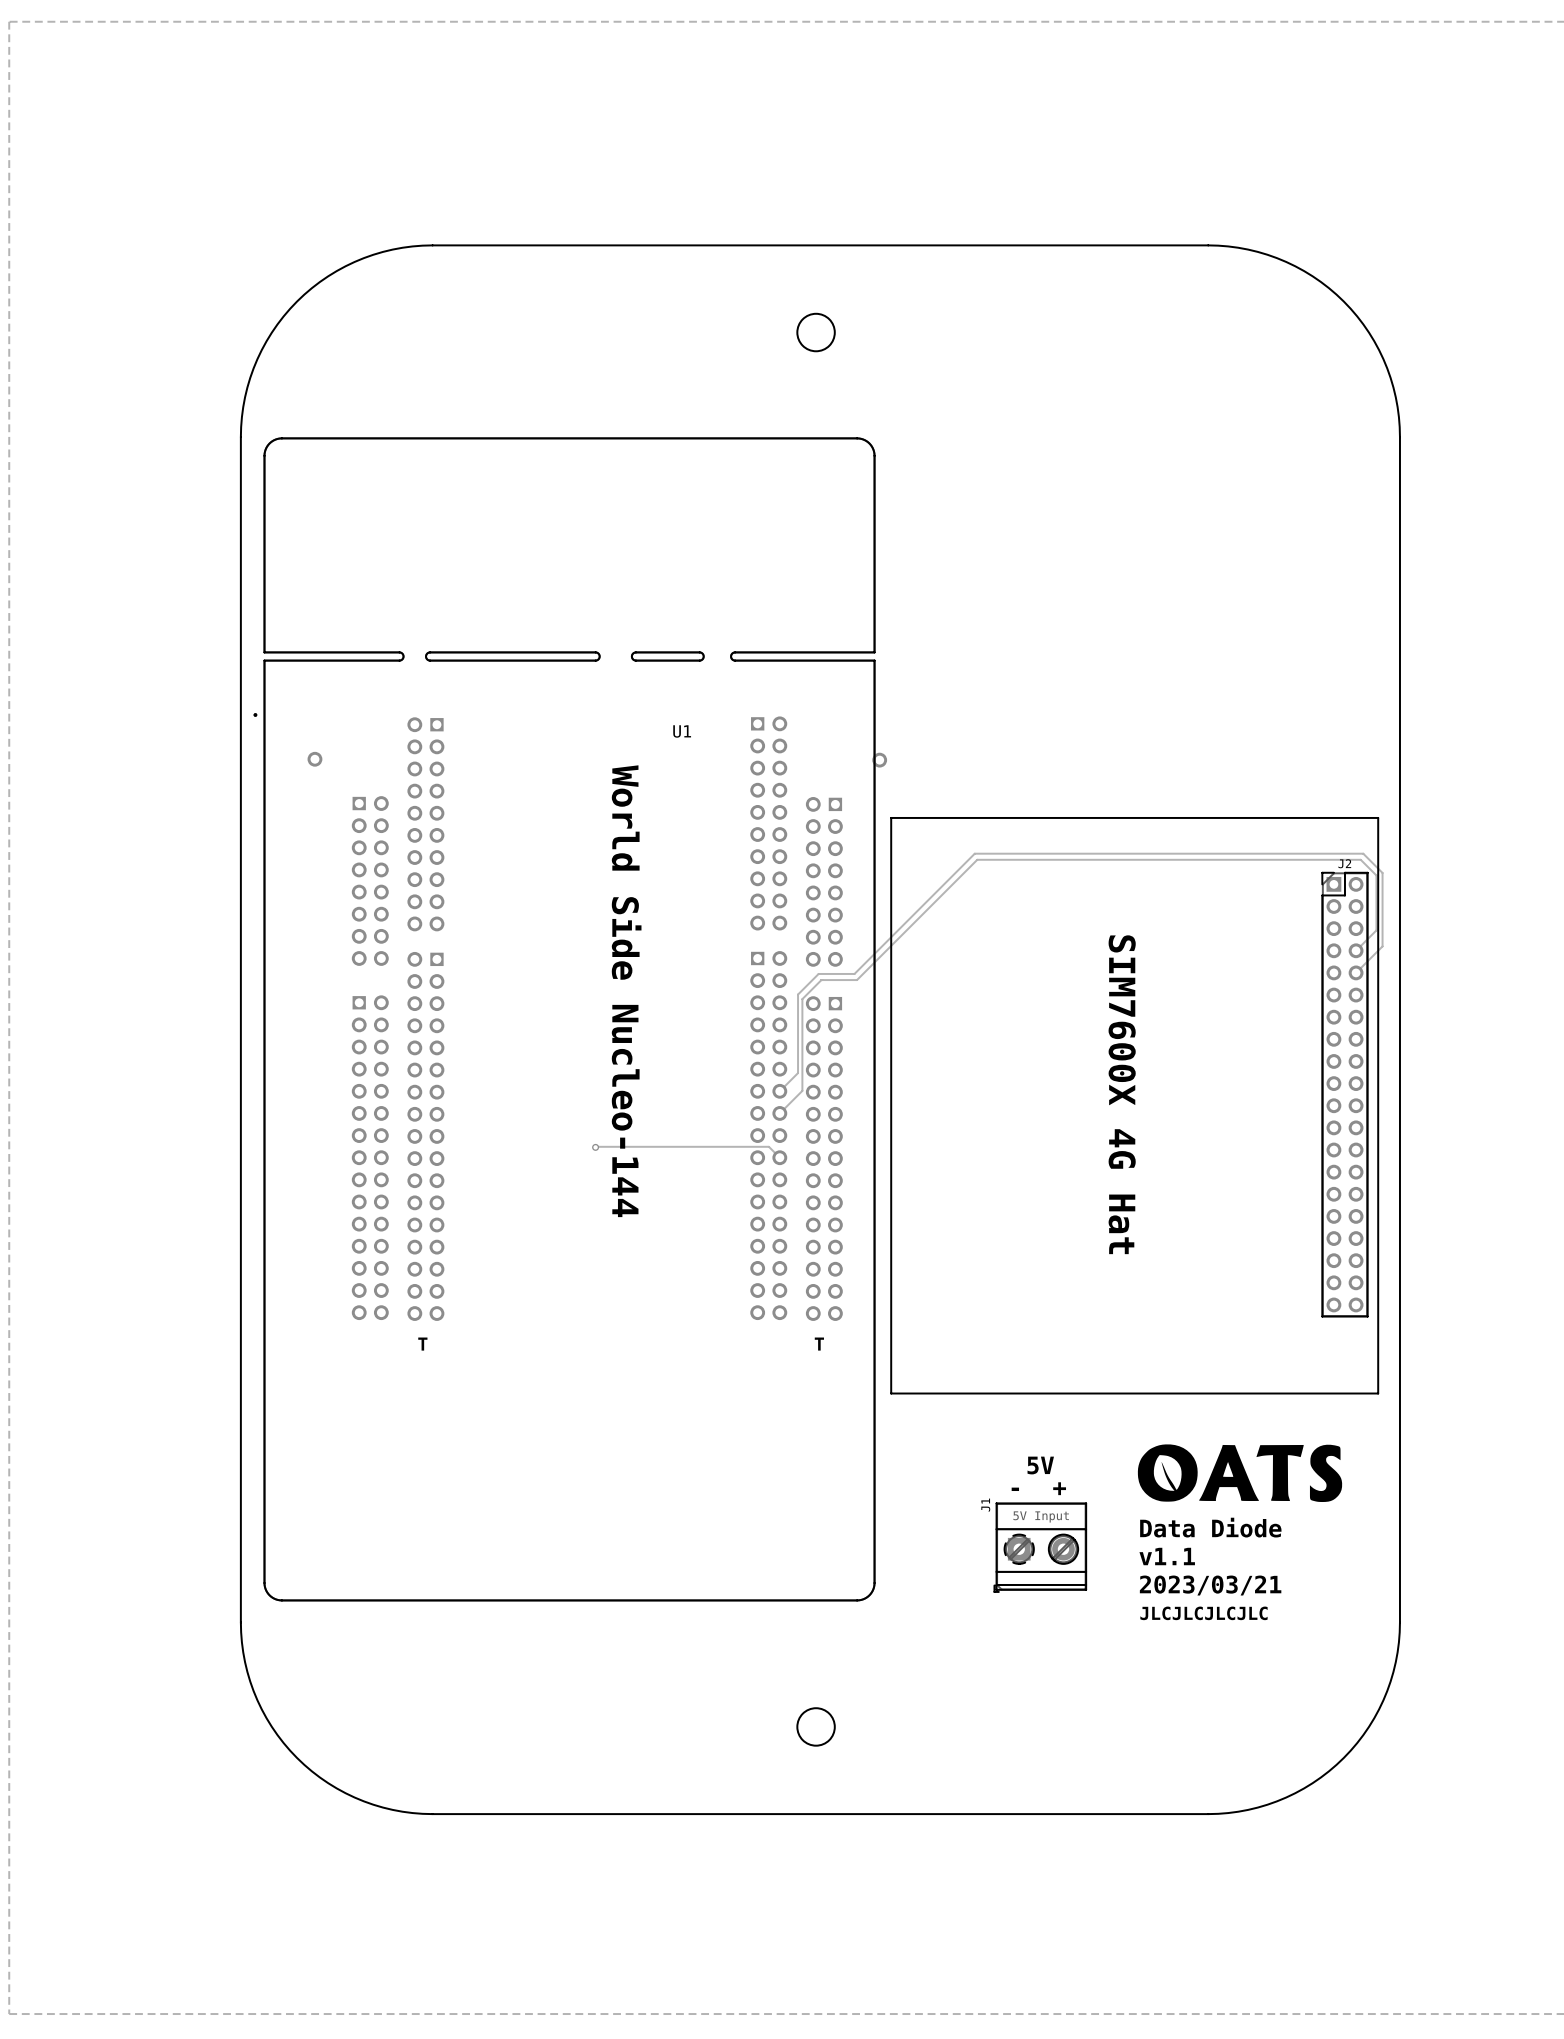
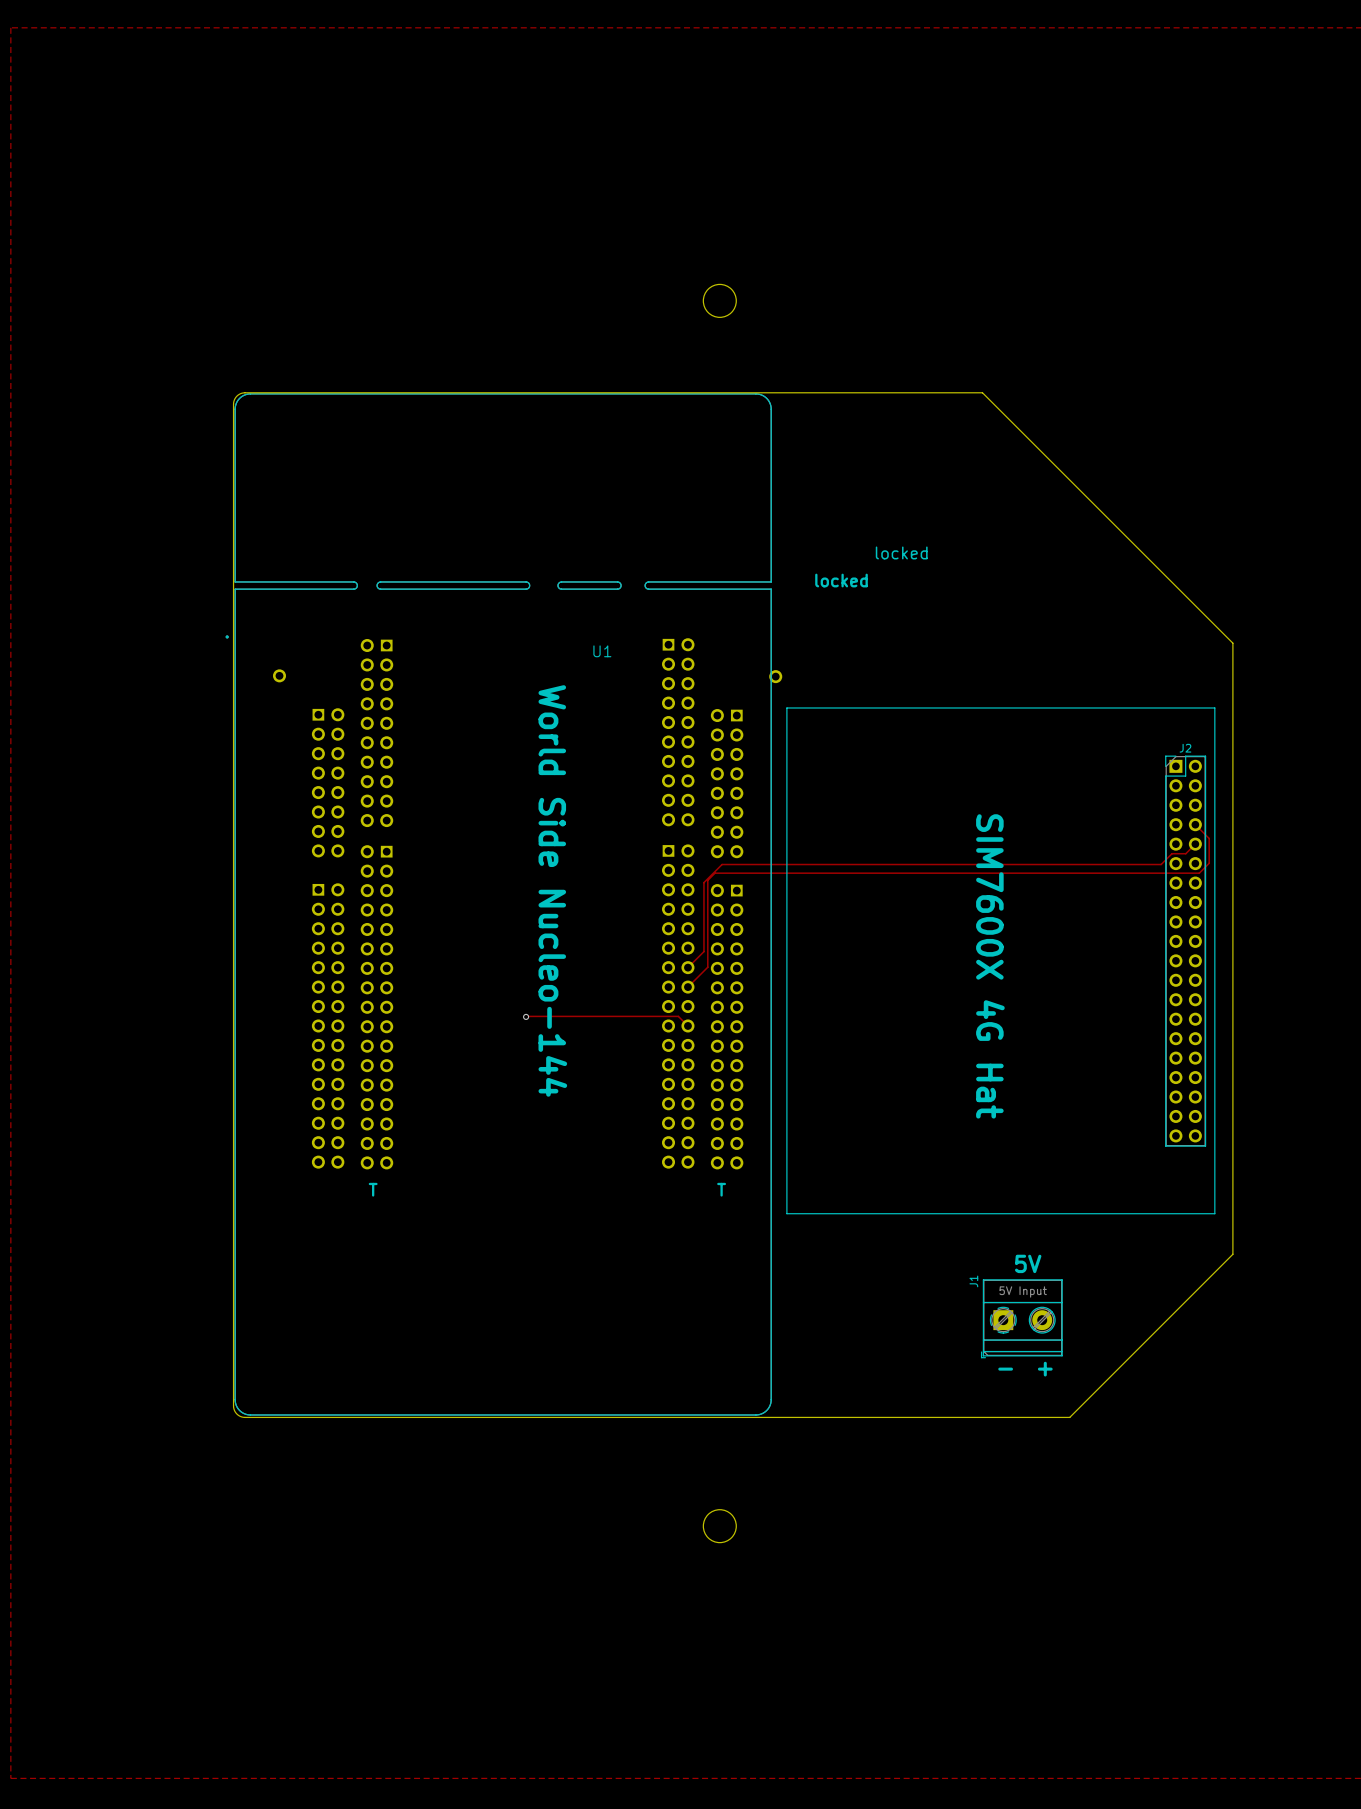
text: none -> locked (901, 552)
text: none -> locked (841, 580)
board edge: (1399, 722) (1399, 427) (1397, 407) (1390, 377) (1383, 359) (1369, 332) (1343, 301) (1328, 288) (1304, 271) (1276, 258) (1257, 251) (1228, 246) (1208, 245) (432, 245) (402, 247) (373, 254) (345, 266) (319, 282) (304, 294) (283, 316) (266, 341) (253, 368) (247, 387) (241, 417) (240, 437) (241, 1632) (247, 1671) (261, 1709) (277, 1735) (304, 1764) (328, 1783) (363, 1801) (392, 1809) (422, 1813) (1208, 1814) (1238, 1811) (1267, 1804) (1304, 1788) (1328, 1771) (1343, 1757) (1369, 1726) (1379, 1709) (1390, 1681) (1395, 1662) (1399, 1632) (1399, 1417) -> (1232, 643) (982, 392) (245, 392) (238, 395) (233, 401) (233, 1405) (238, 1415) (245, 1417) (1069, 1417) (1232, 1254)
line: (891, 817) (1378, 817) (1378, 1393) (891, 1393) (891, 817) -> (786, 707) (1214, 707) (1214, 1213) (786, 1213) (786, 707)
track: (1356, 950) (1376, 930) (1376, 875) (1360, 859) (977, 859) (857, 980) (821, 980) -> none
track: (1356, 972) (1382, 946) (1382, 872) (1363, 853) (974, 853) (854, 973) -> (1195, 844) (1185, 853) (1171, 853) (1161, 864) (753, 864)
track: (821, 980) (802, 999) -> (1195, 824) (1209, 838) (1209, 863) (1199, 873) (714, 873) (707, 880) (707, 886)
text position: SIM7600X 4G Hat (1122, 1094) -> SIM7600X 4G Hat (990, 966)
J2 position: (1344, 1094) -> (1185, 951)
drawing: [1137, 1444, 1343, 1503] -> none
text position: 5V (1040, 1465) -> 5V (1028, 1263)
text position: + (1059, 1488) -> + (1045, 1369)
text position: - (1015, 1489) -> - (1005, 1369)
text: Data Diode (1210, 1527) -> none
J1 position: (1040, 1547) -> (1021, 1318)
text: v1.1 (1167, 1556) -> none
text: 2023/03/21 (1210, 1585) -> none
text: JLCJLCJLCJLC (1203, 1613) -> none

